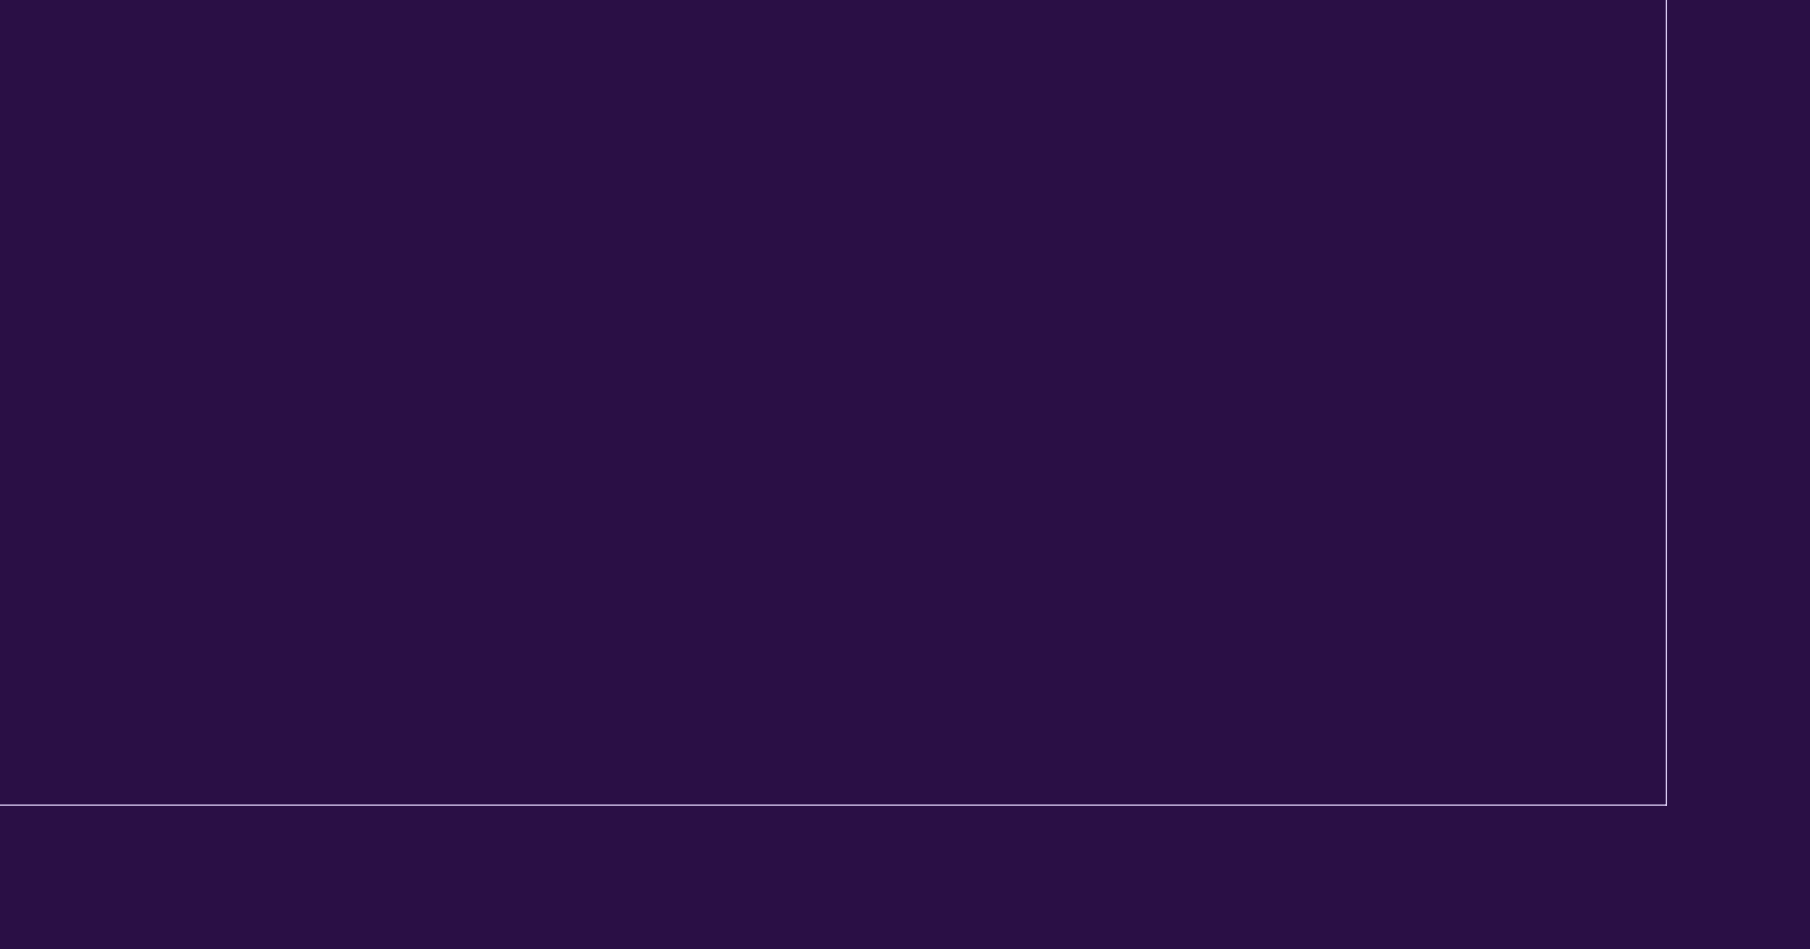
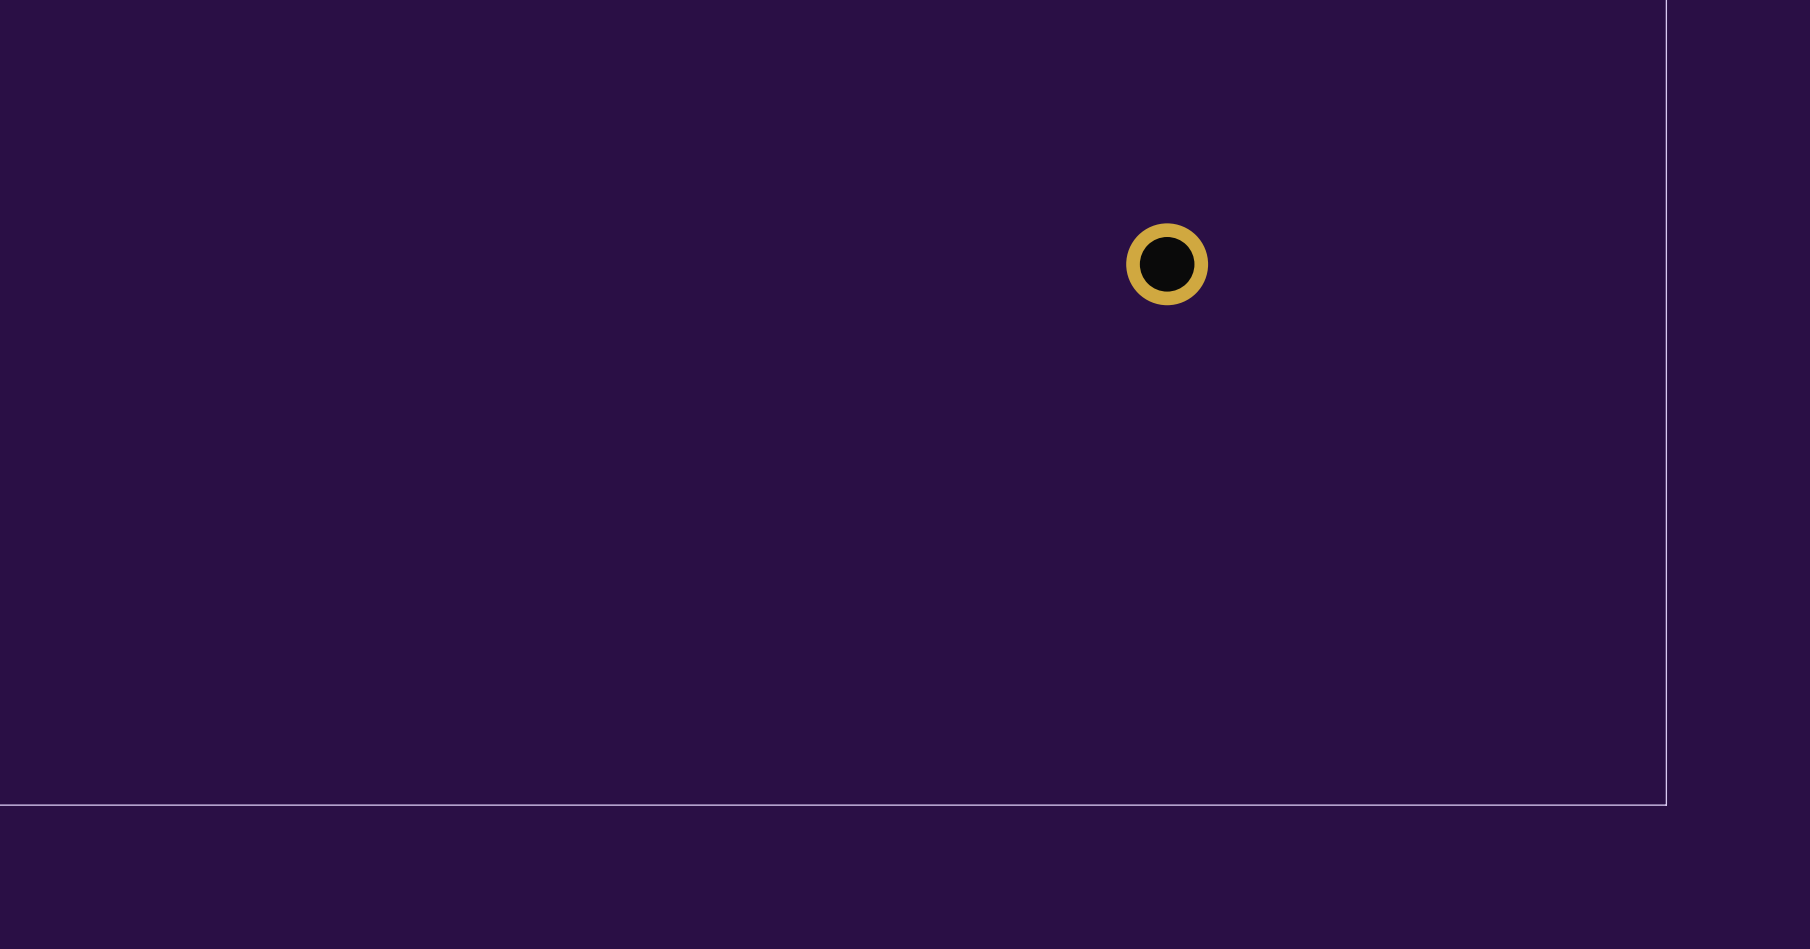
via: none -> (1167, 264)

